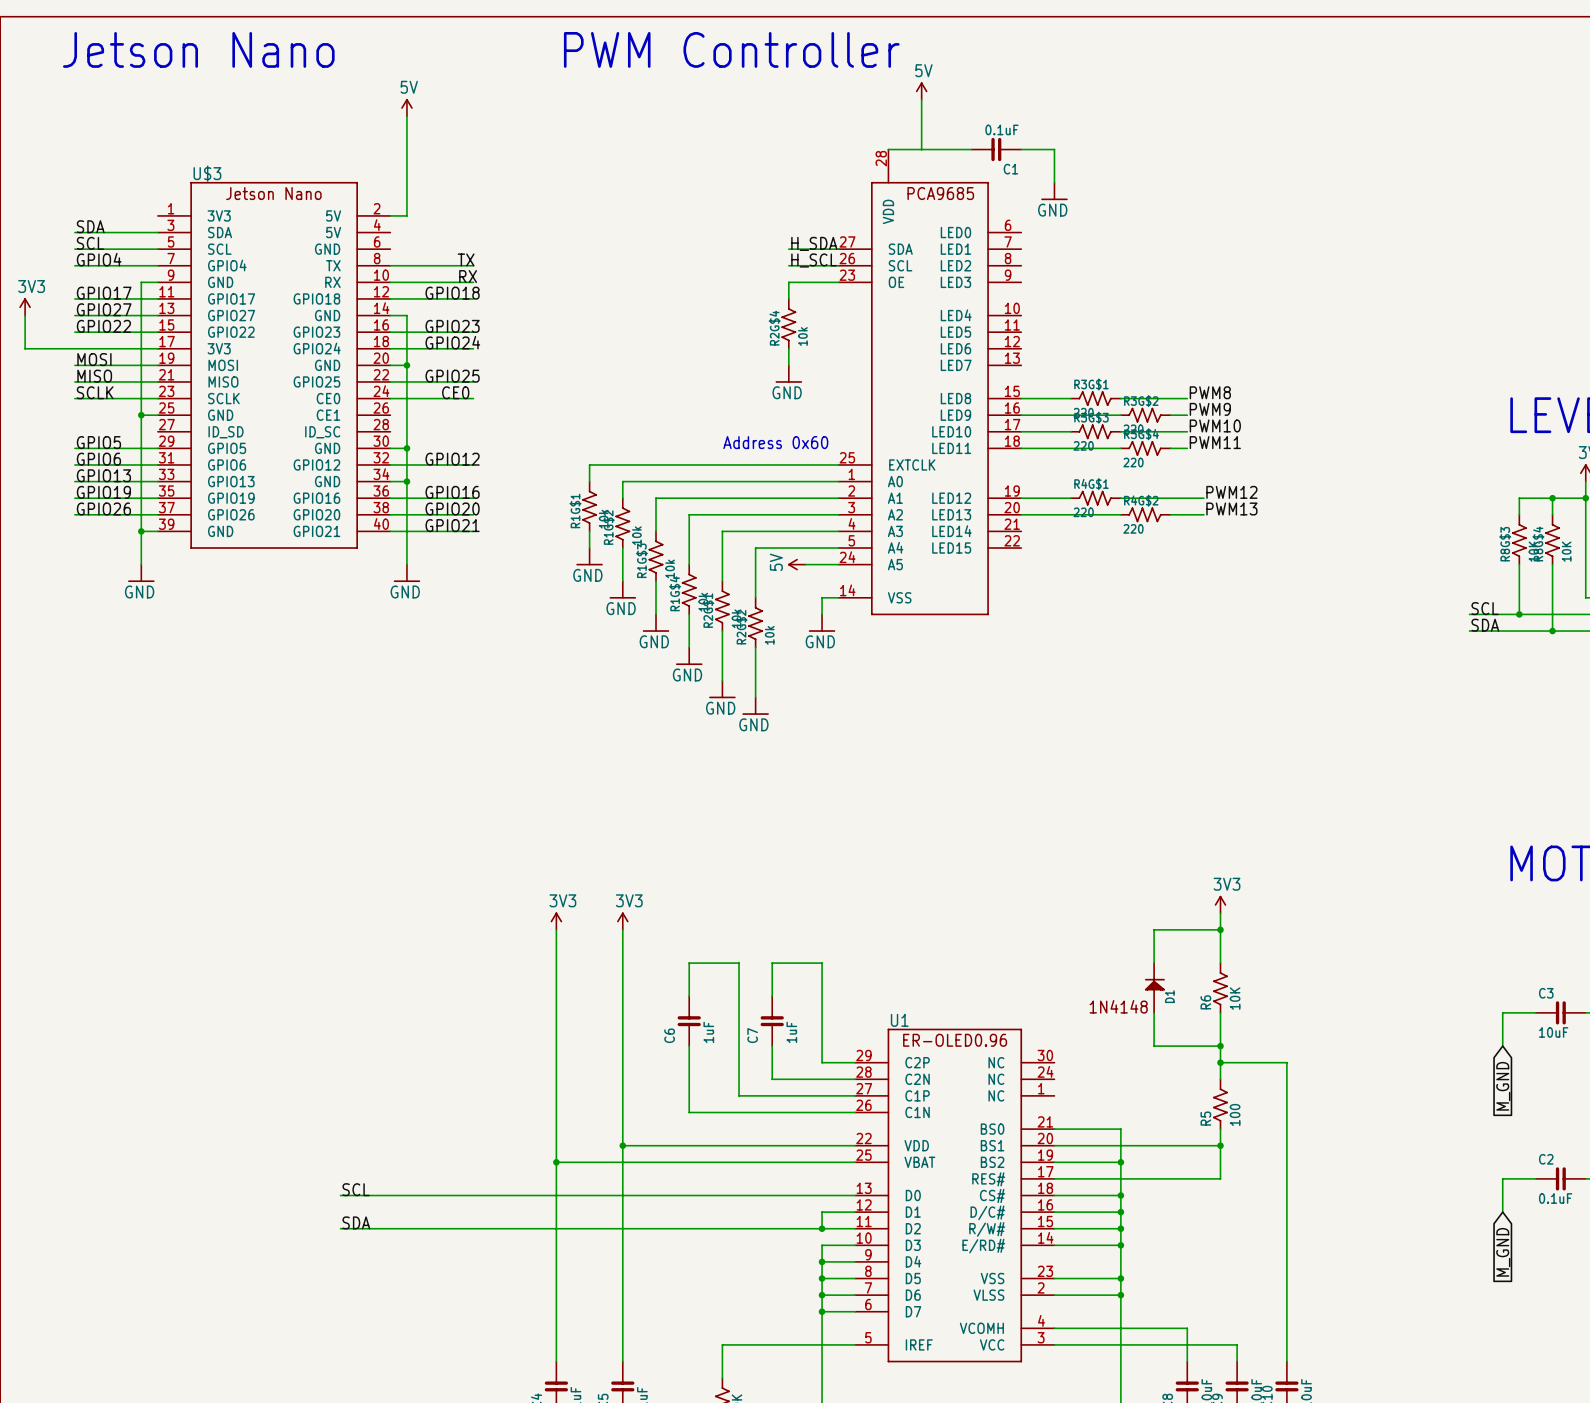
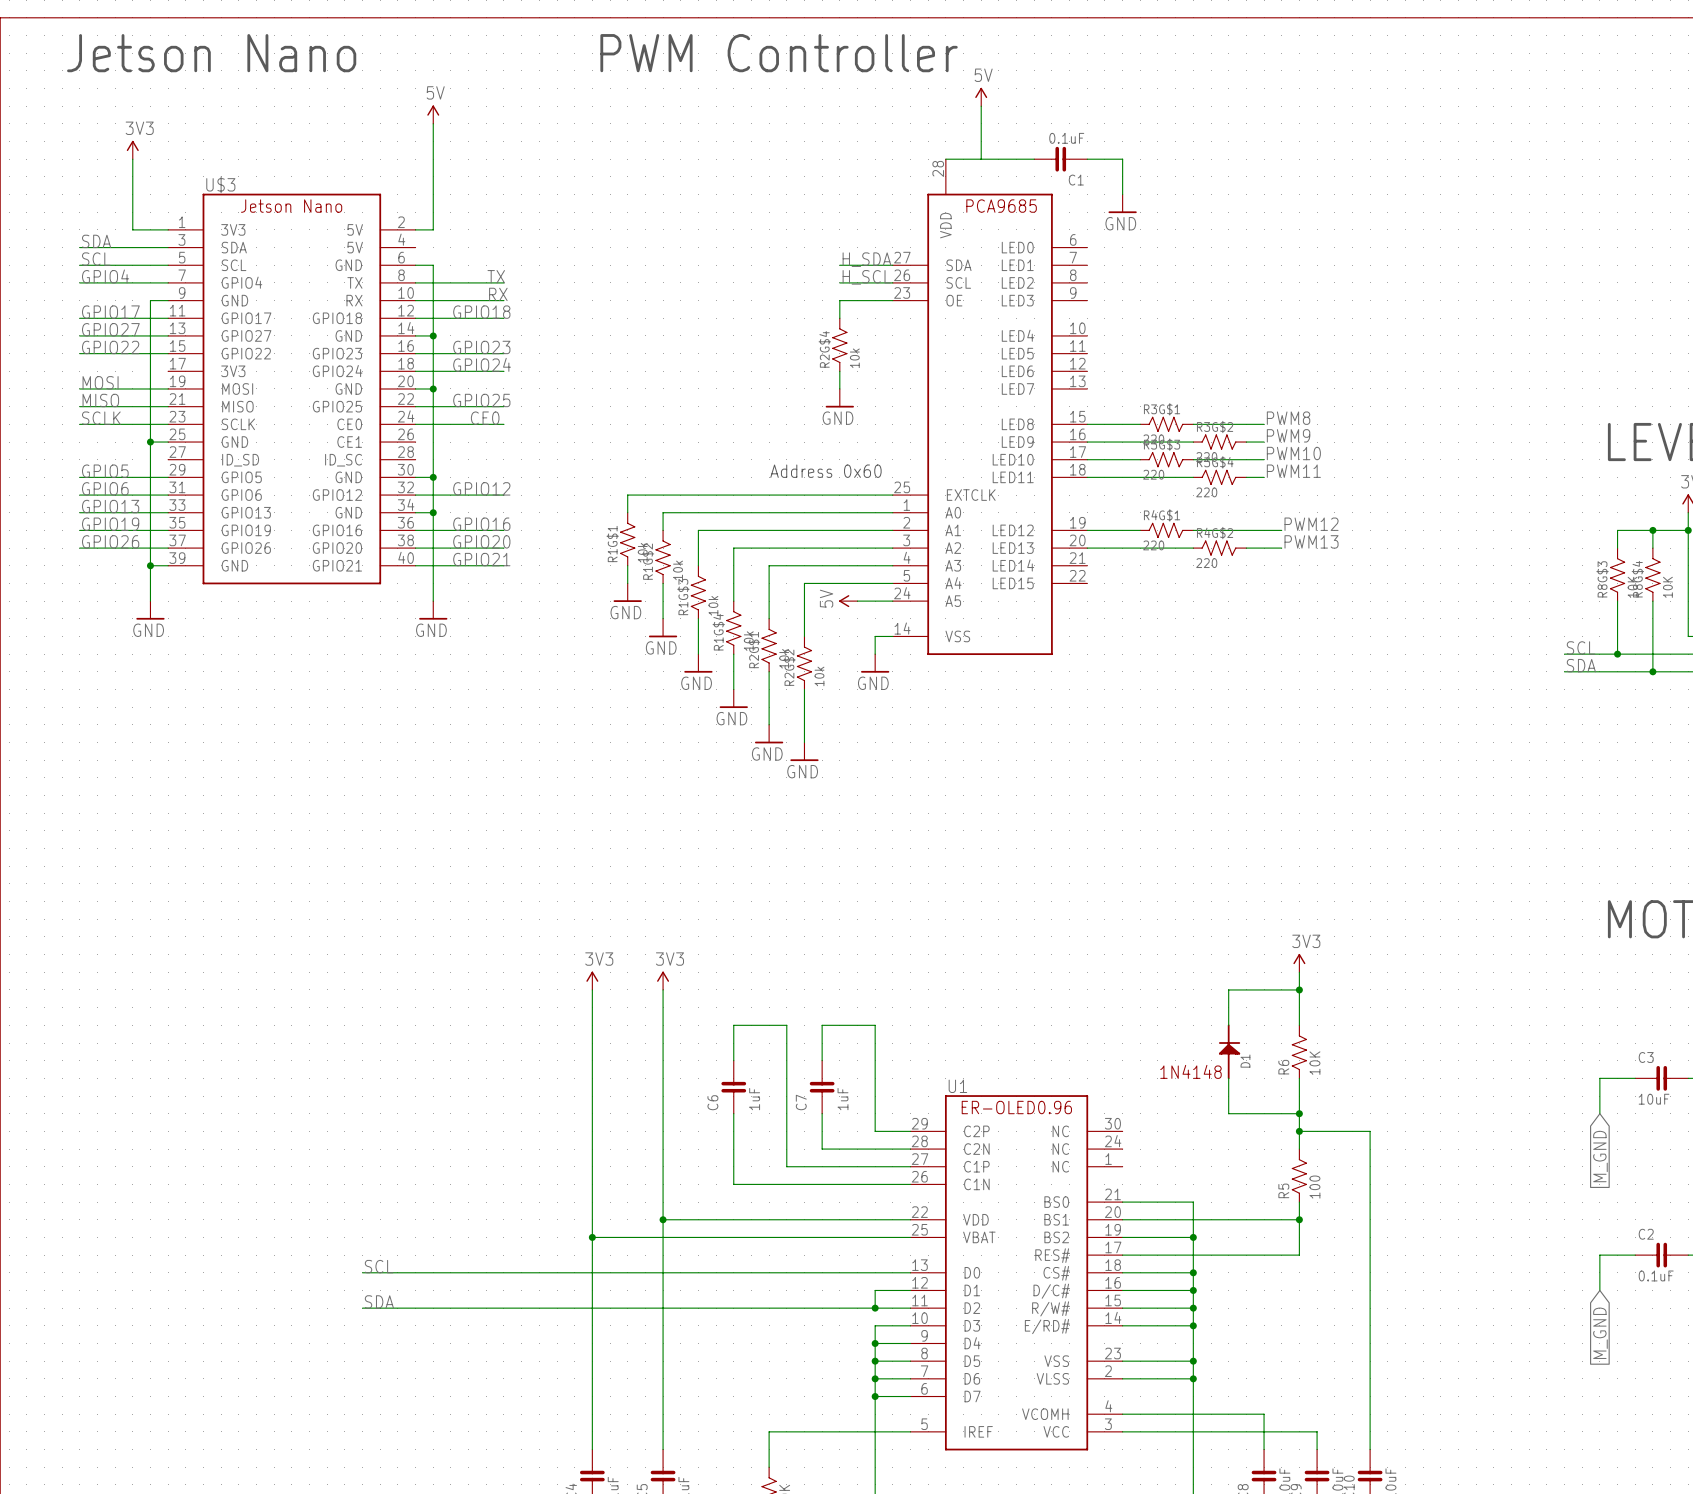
power symbol: none -> 3V3 (132, 150)
wire: none -> (132, 159) (132, 229) (168, 229)
wire: none -> (415, 265) (433, 265) (433, 335)
power symbol: 3V3 (25, 306) -> none
wire: (25, 315) (25, 348) (157, 348) -> none
junction: none -> (433, 335)

